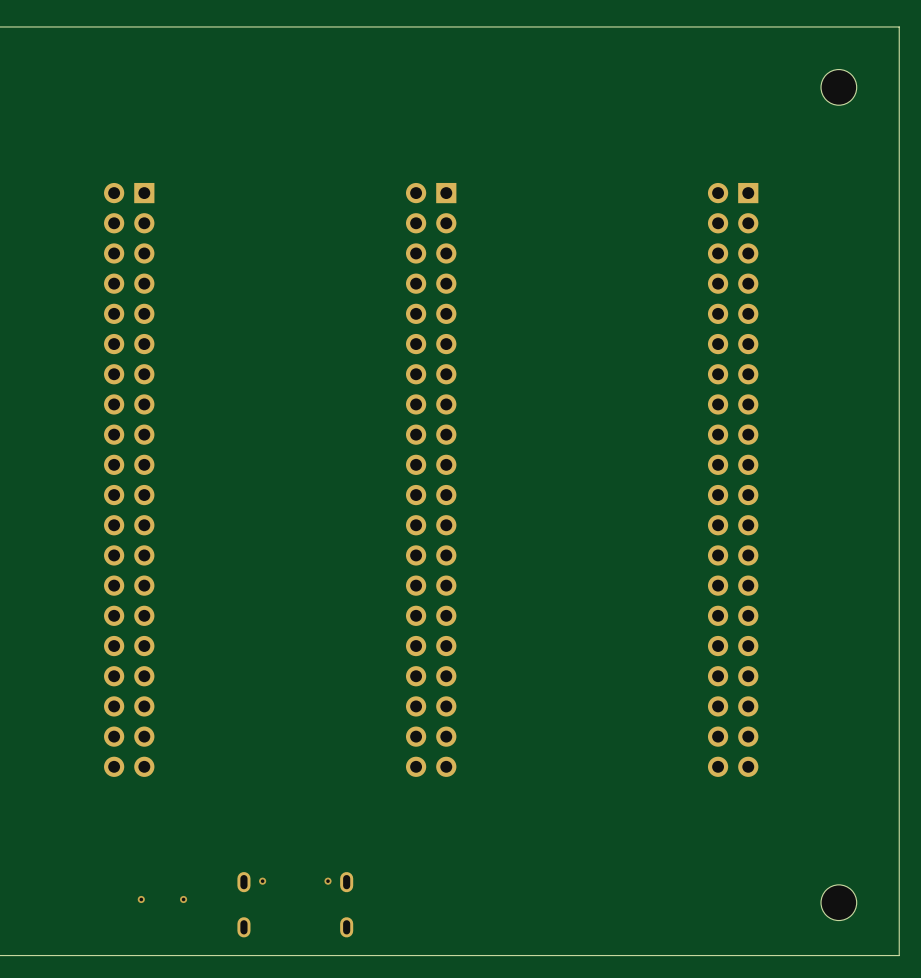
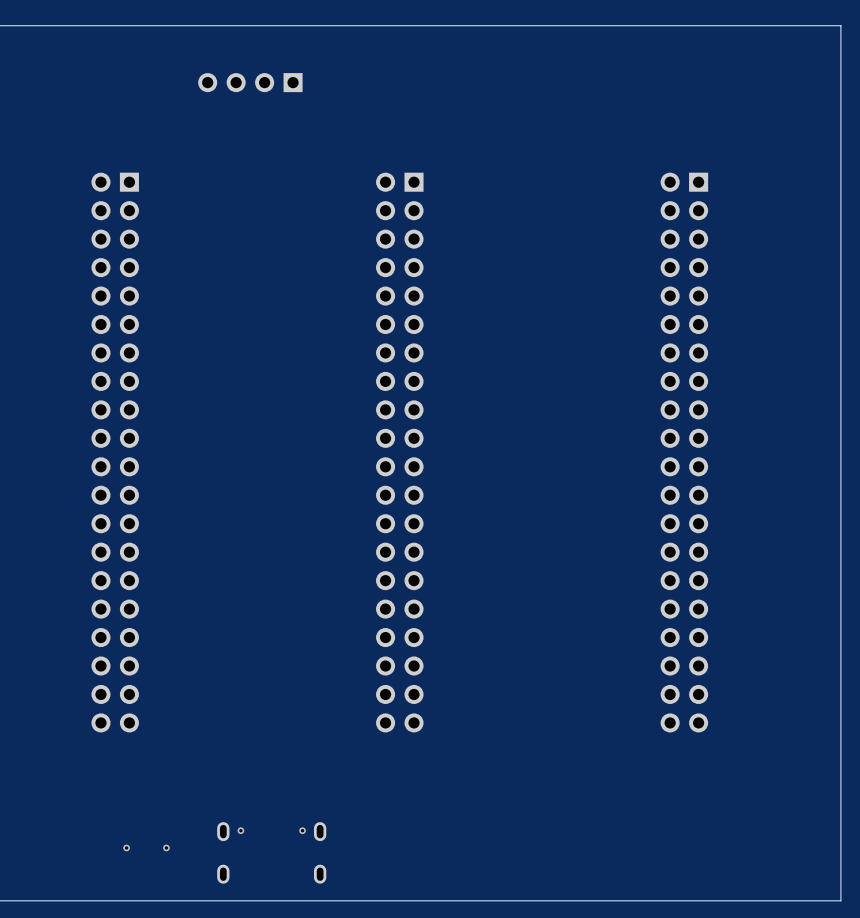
part: none -> (250, 82)
part: (838, 87) -> none
part: (838, 902) -> none

